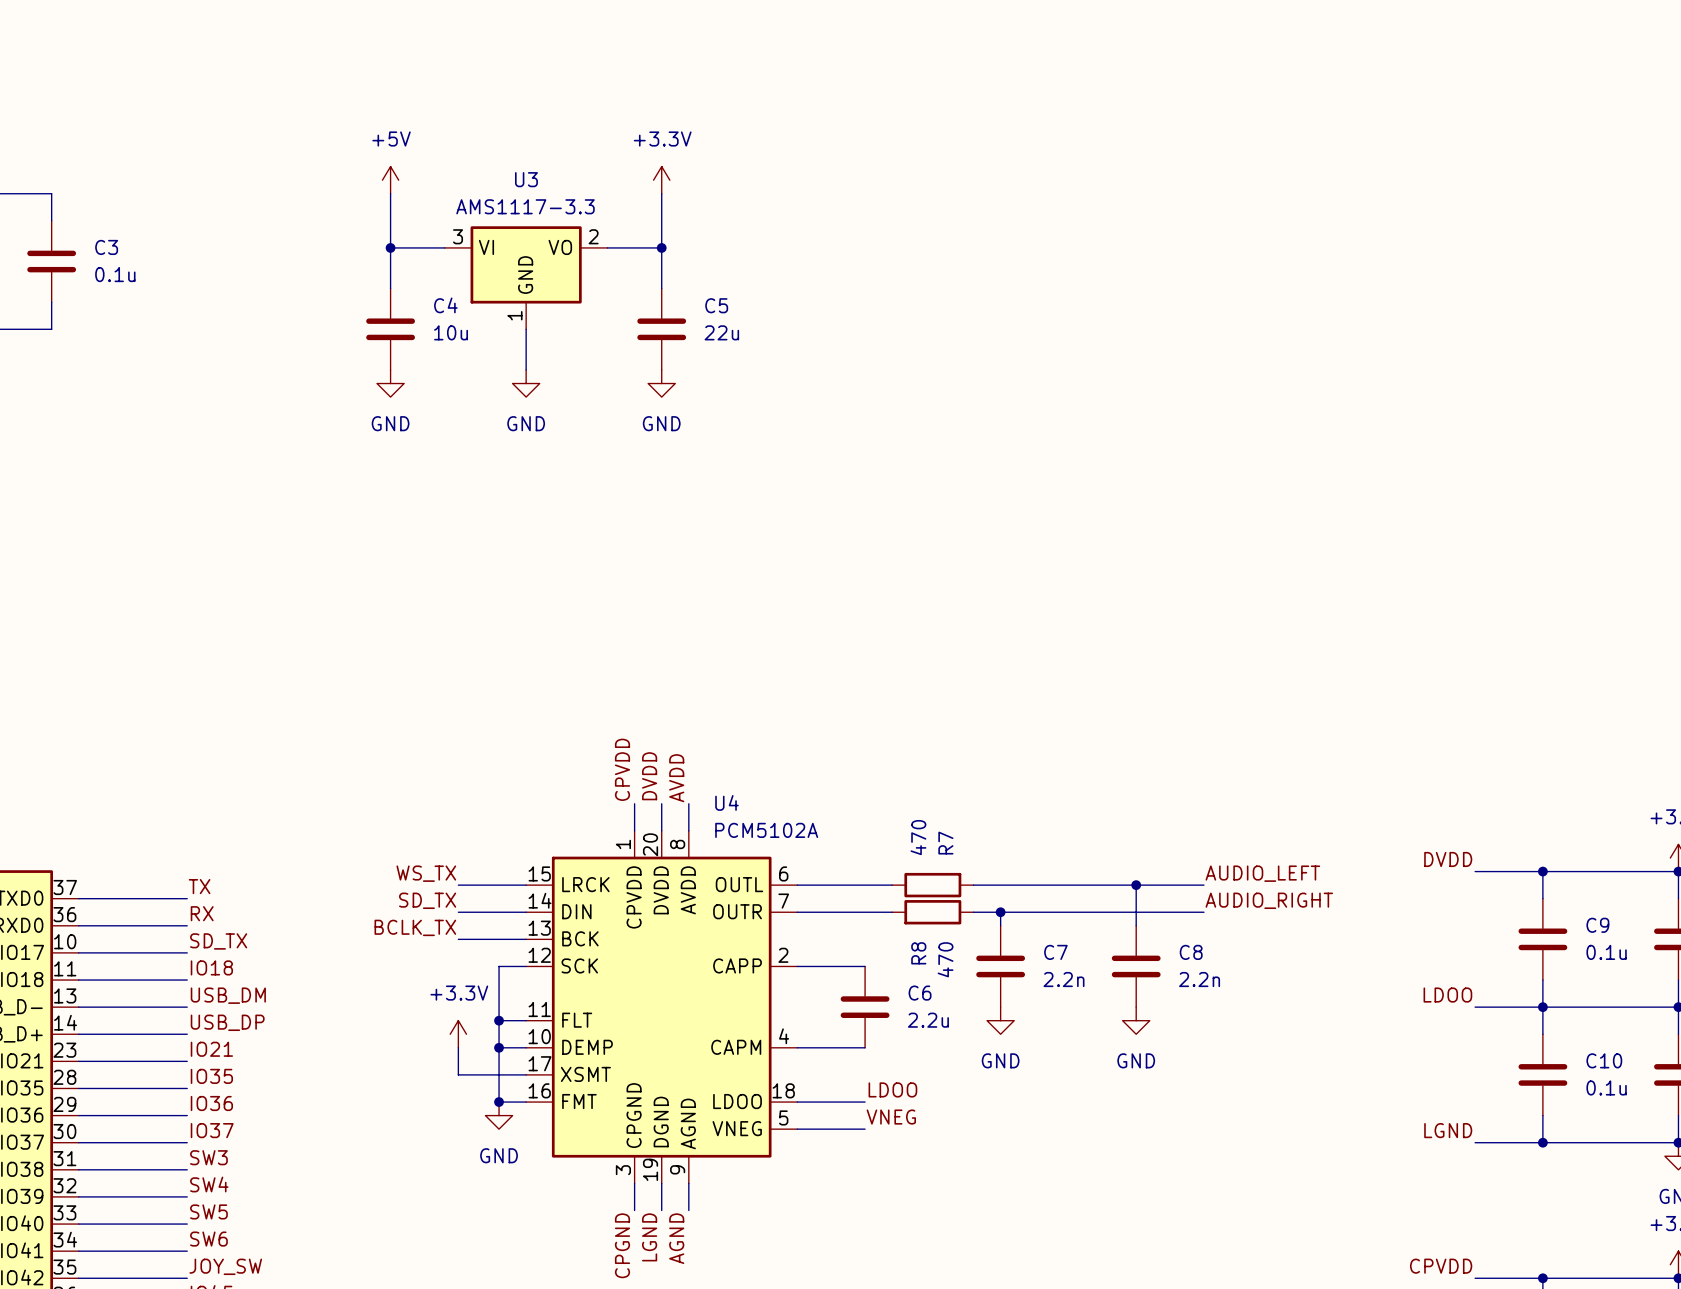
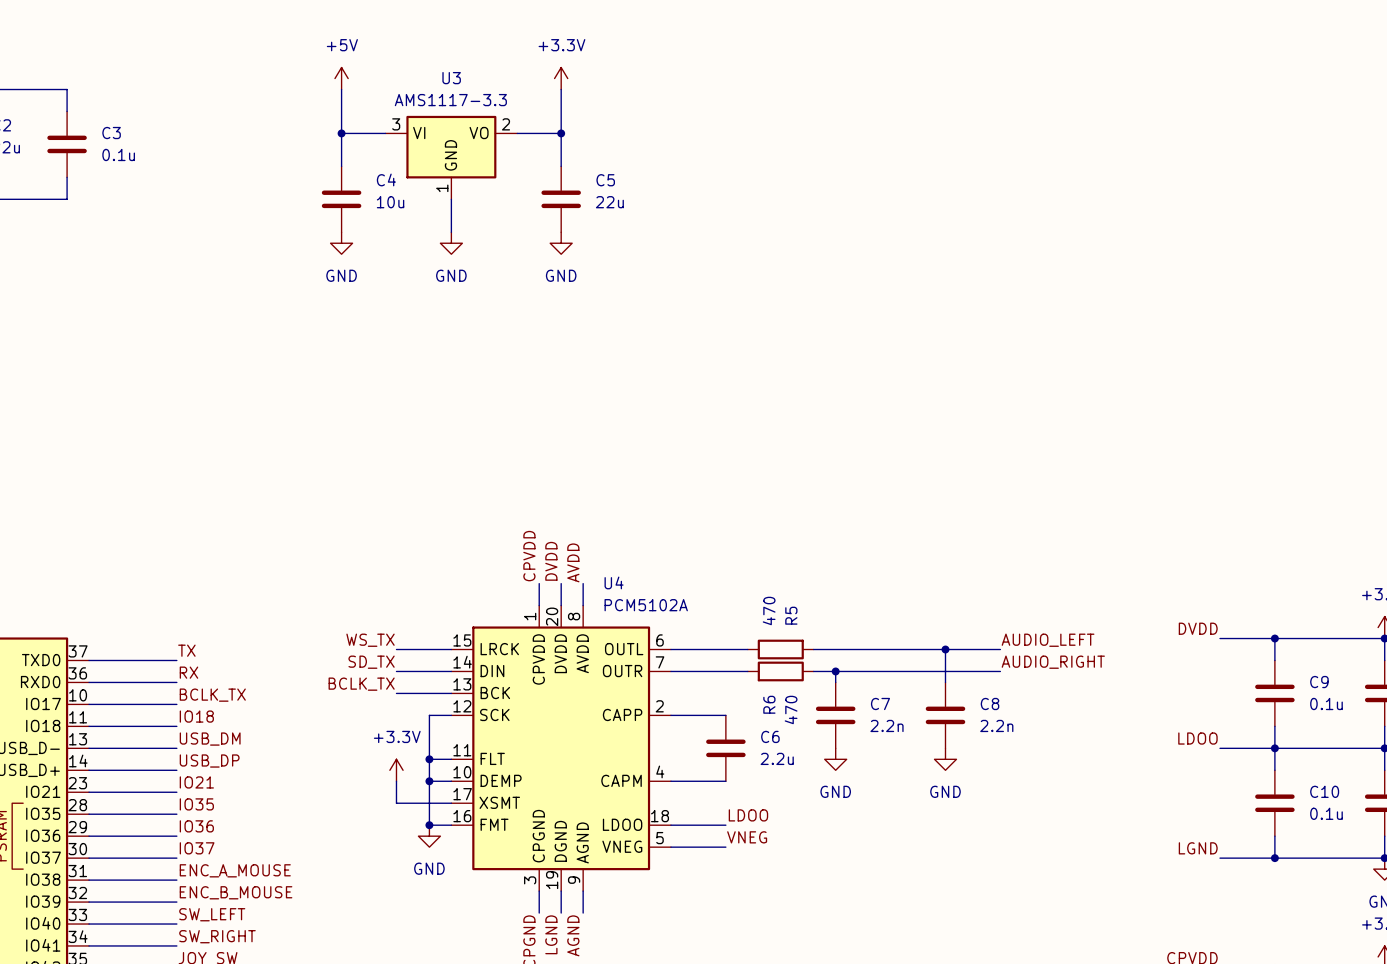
R7 name: R7 (945, 843) -> R5 (791, 615)
label: SD_TX (218, 941) -> BCLK_TX (212, 695)
R8 name: R8 (918, 953) -> R6 (769, 704)
label: SW3 (208, 1157) -> ENC_A_MOUSE (235, 870)
label: SW4 (209, 1184) -> ENC_B_MOUSE (236, 892)
label: SW5 (208, 1211) -> SW_LEFT (212, 914)
label: SW6 (208, 1239) -> SW_RIGHT (217, 936)

